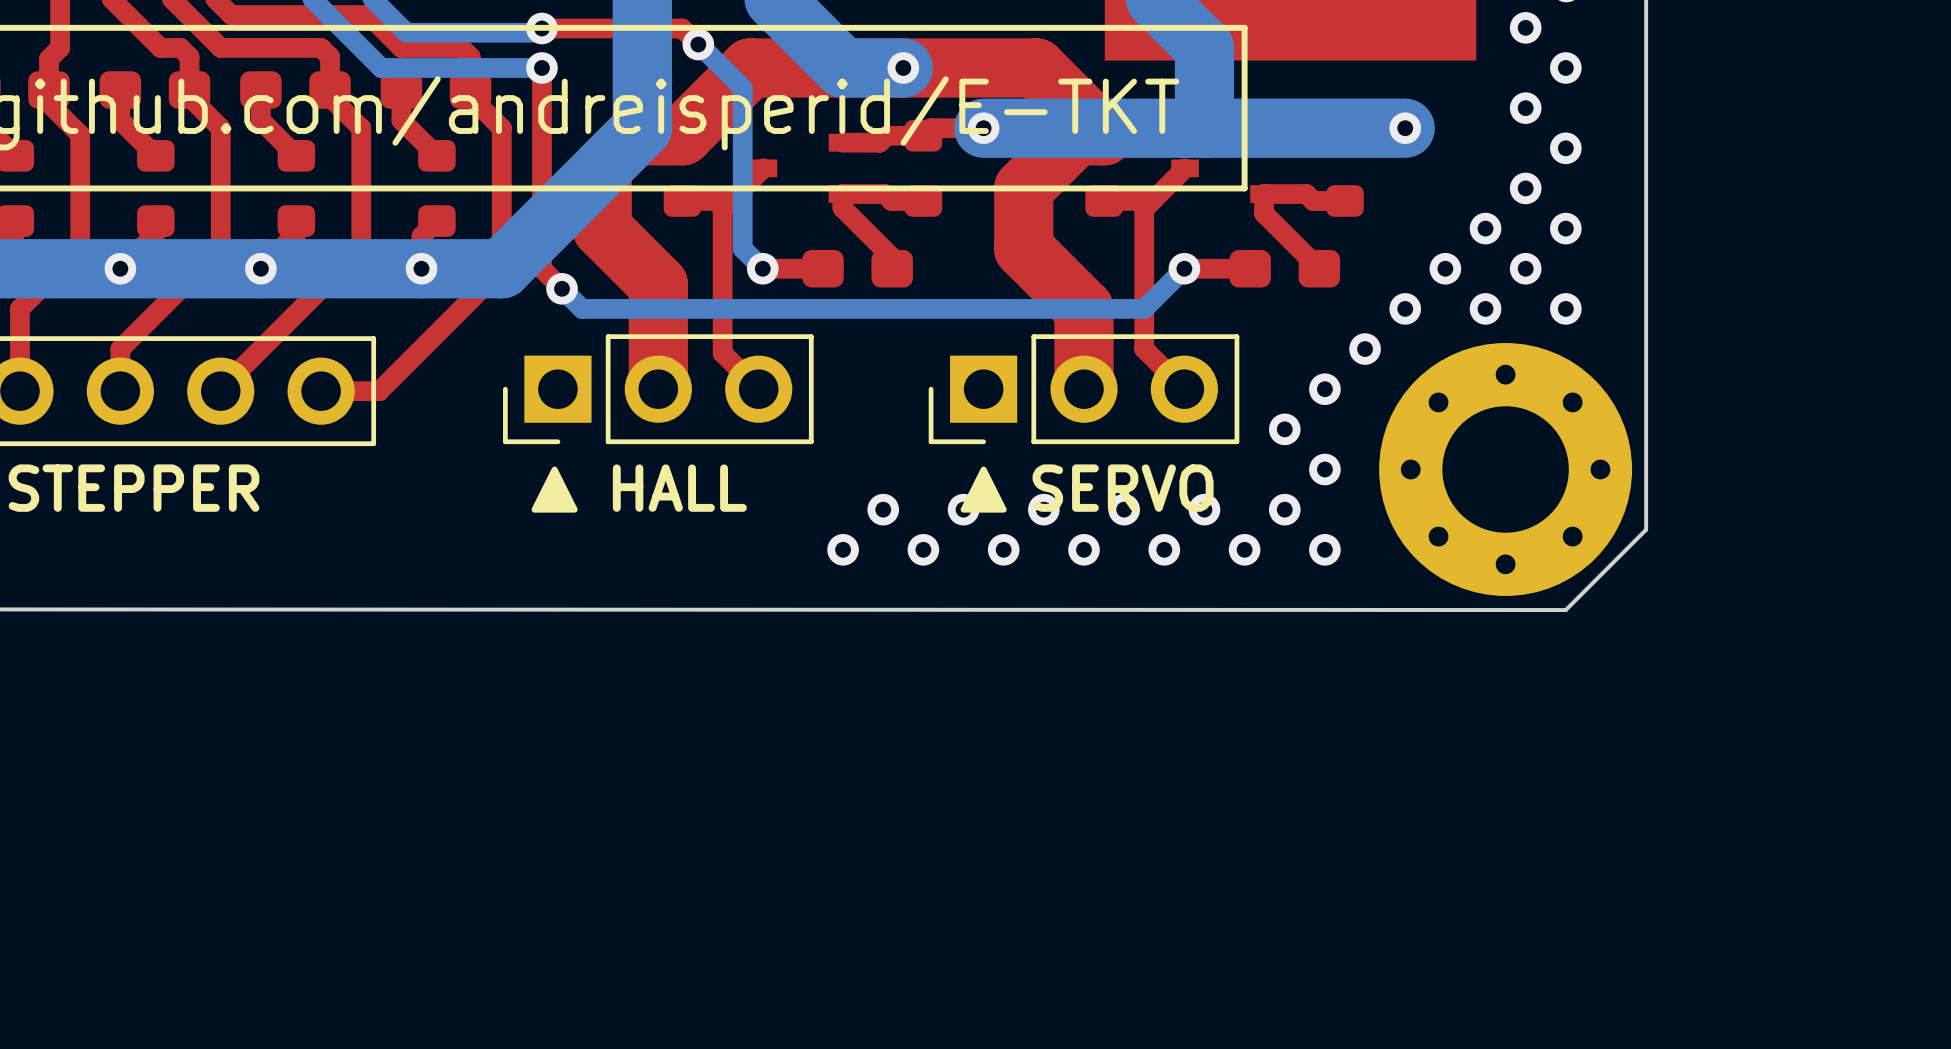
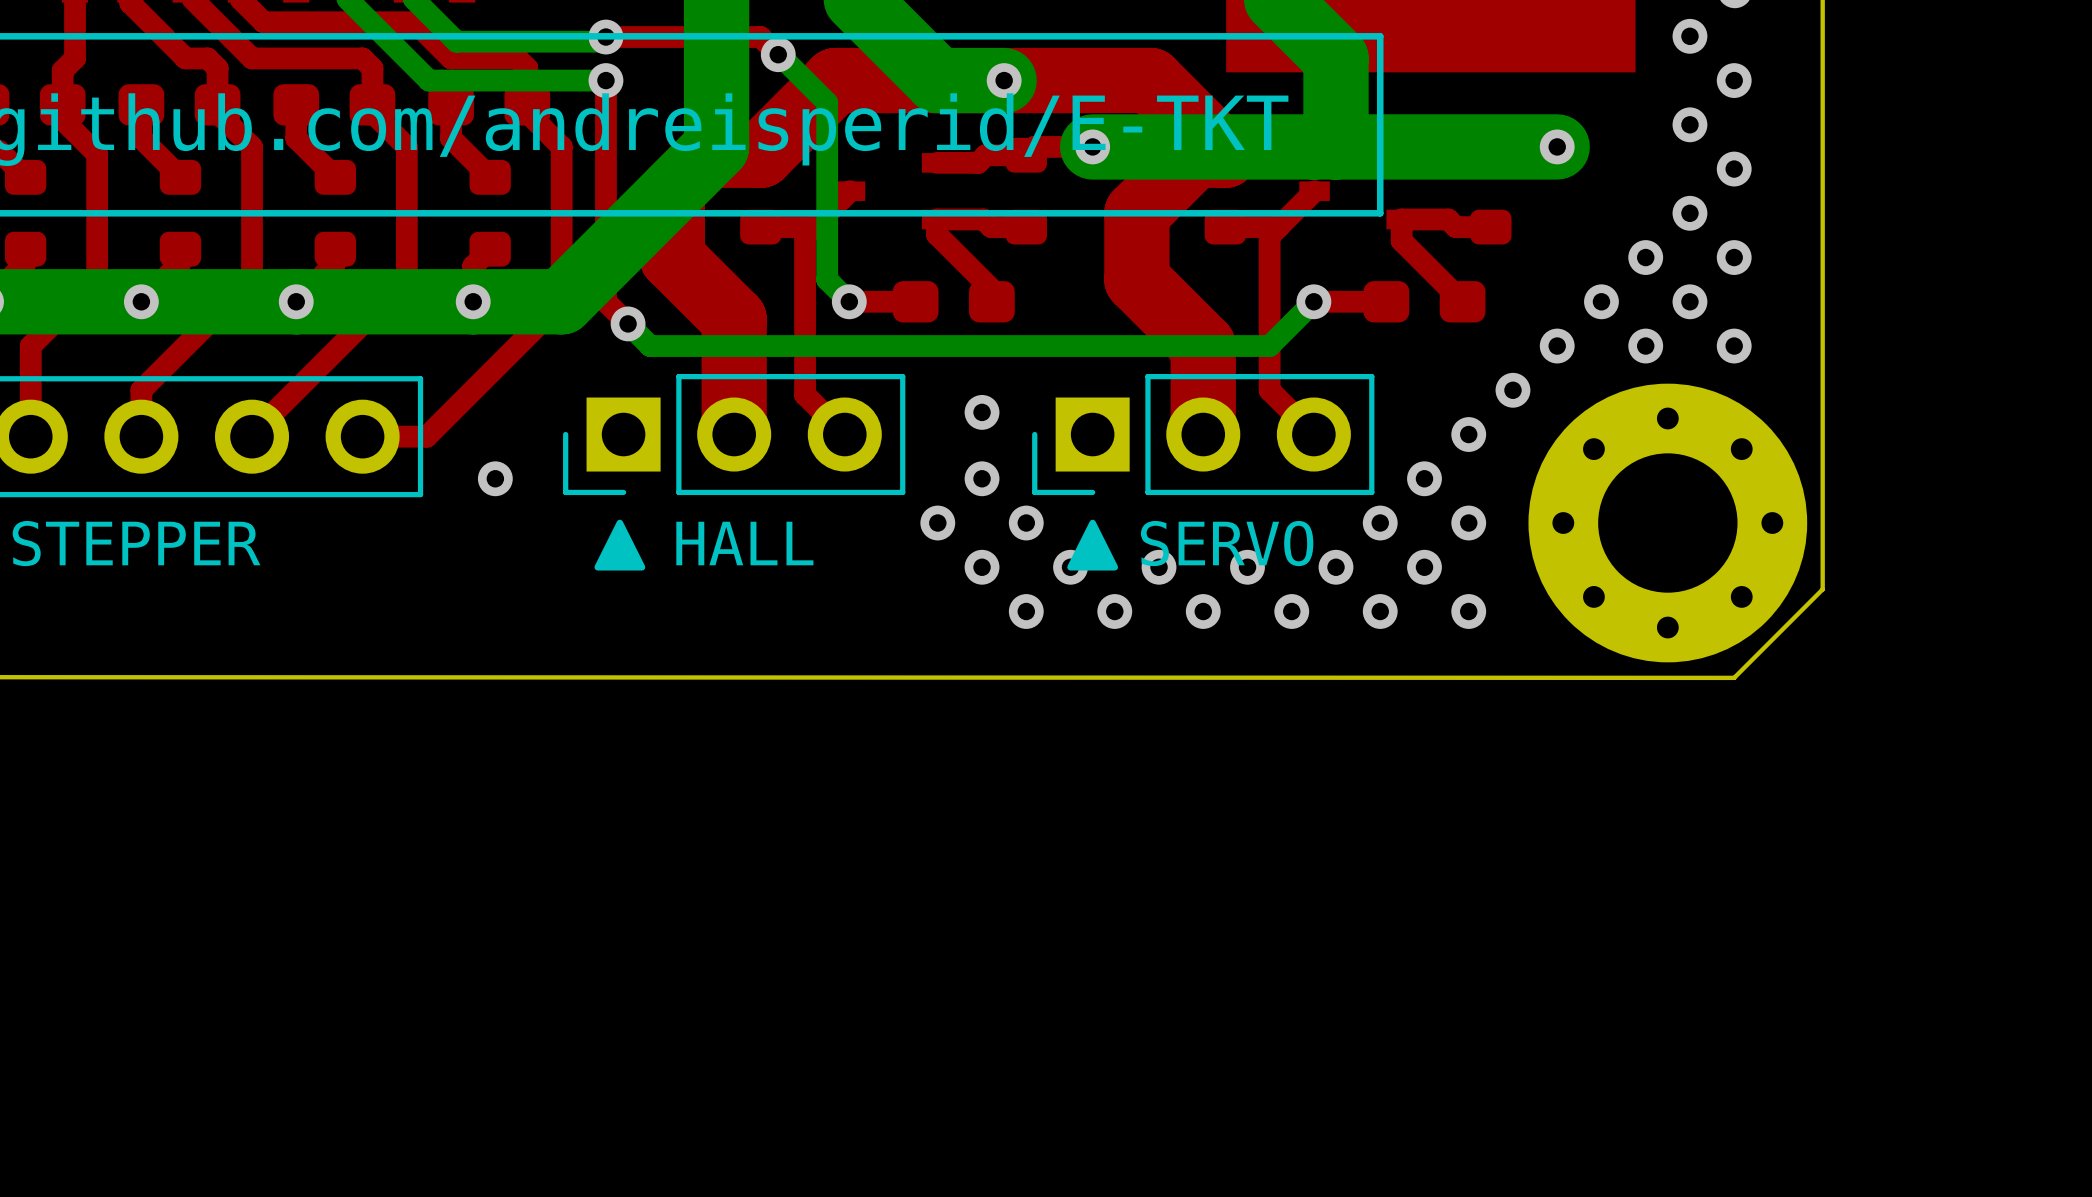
via: none -> (982, 412)
via: none -> (495, 478)
via: none -> (982, 478)
via: none -> (937, 523)
via: none -> (1026, 523)
via: none -> (1380, 523)
via: (843, 549) -> none

